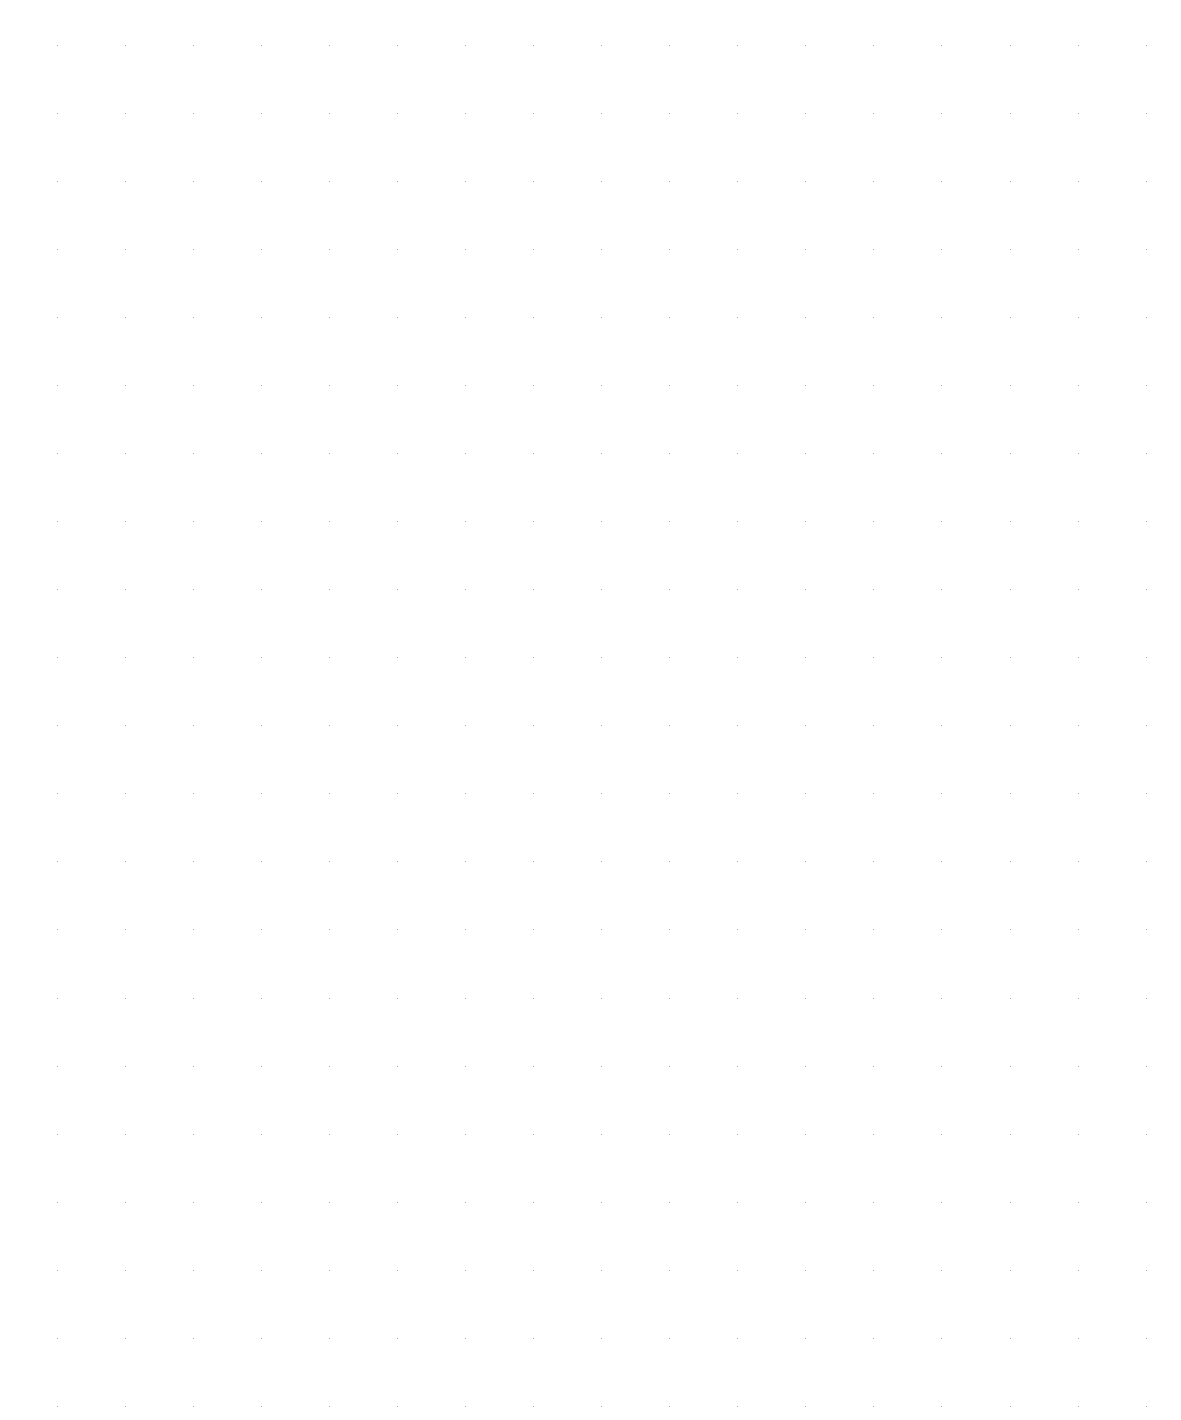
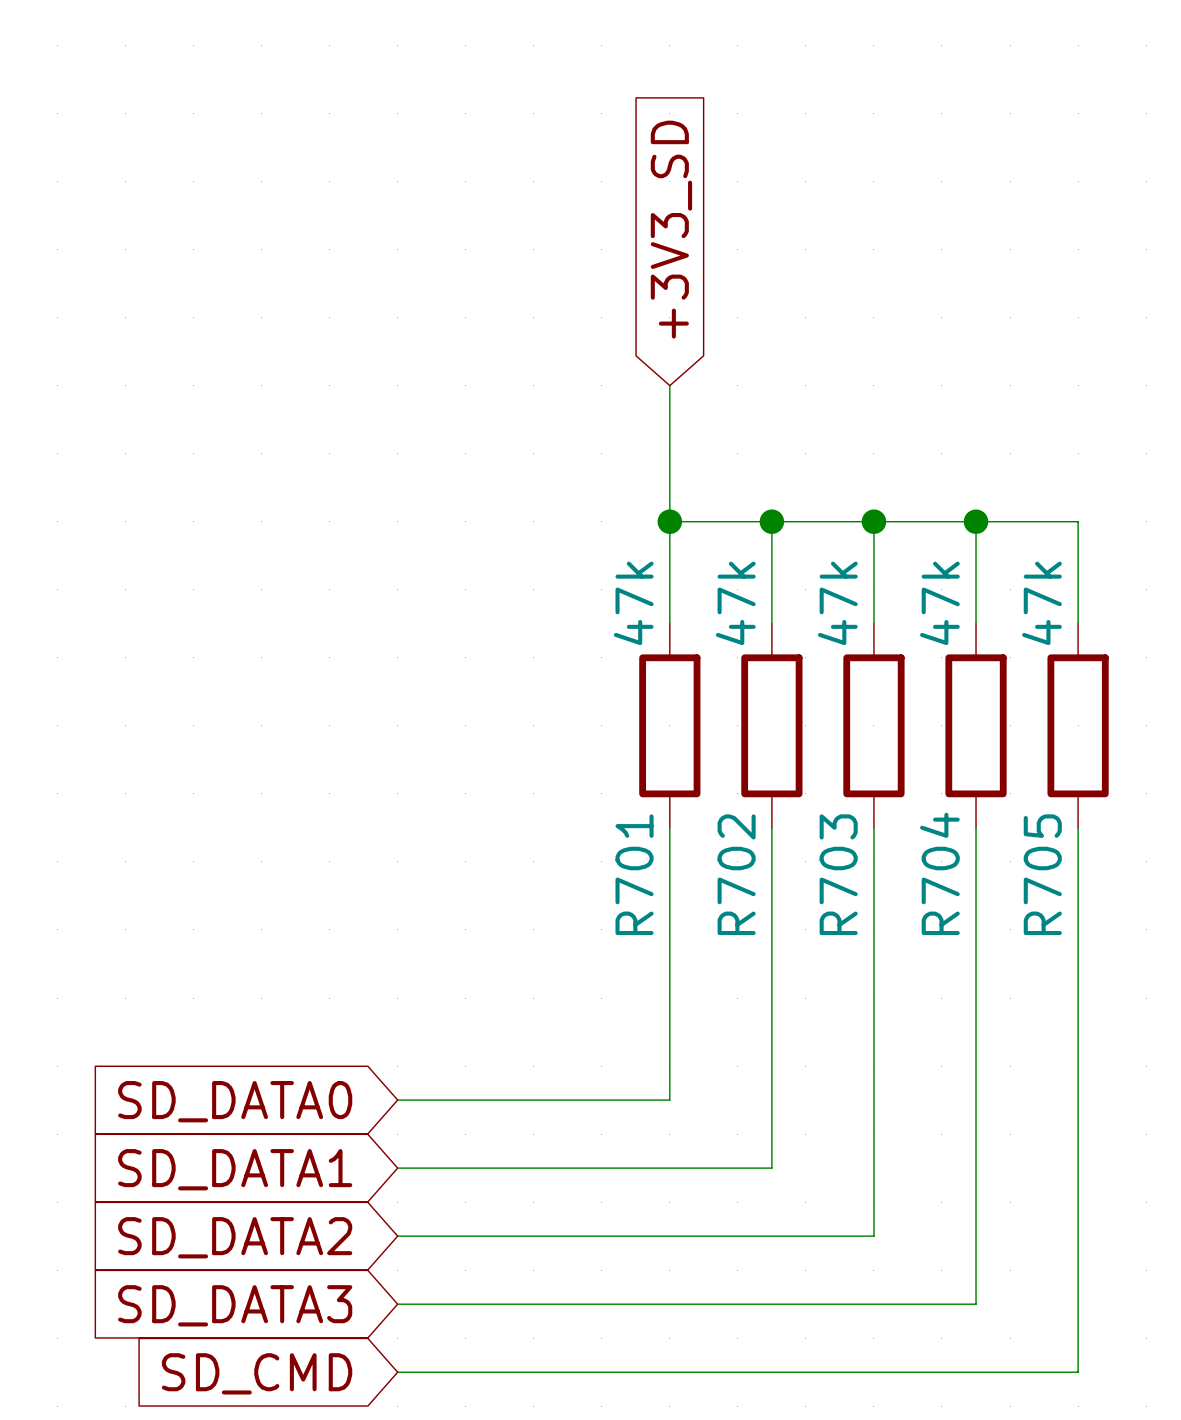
global label: none -> +3V3_SD (671, 229)
wire: none -> (669, 385) (669, 623)
wire: none -> (669, 521) (1078, 521) (1078, 623)
junction: none -> (669, 521)
wire: none -> (771, 521) (771, 623)
junction: none -> (771, 521)
wire: none -> (873, 521) (873, 623)
junction: none -> (873, 521)
wire: none -> (976, 521) (976, 623)
junction: none -> (976, 521)
R701: none -> 47k (669, 725)
R702: none -> 47k (771, 725)
R703: none -> 47k (873, 725)
R704: none -> 47k (976, 725)
R705: none -> 47k (1078, 725)
wire: none -> (669, 827) (669, 1100) (397, 1100)
wire: none -> (771, 827) (771, 1168) (397, 1168)
wire: none -> (873, 827) (873, 1236) (397, 1236)
wire: none -> (976, 827) (976, 1304) (397, 1304)
wire: none -> (1078, 827) (1078, 1372) (397, 1372)
global label: none -> SD_DATA0 (235, 1101)
global label: none -> SD_DATA1 (235, 1169)
global label: none -> SD_DATA2 (235, 1237)
global label: none -> SD_DATA3 (235, 1305)
global label: none -> SD_CMD (257, 1373)

